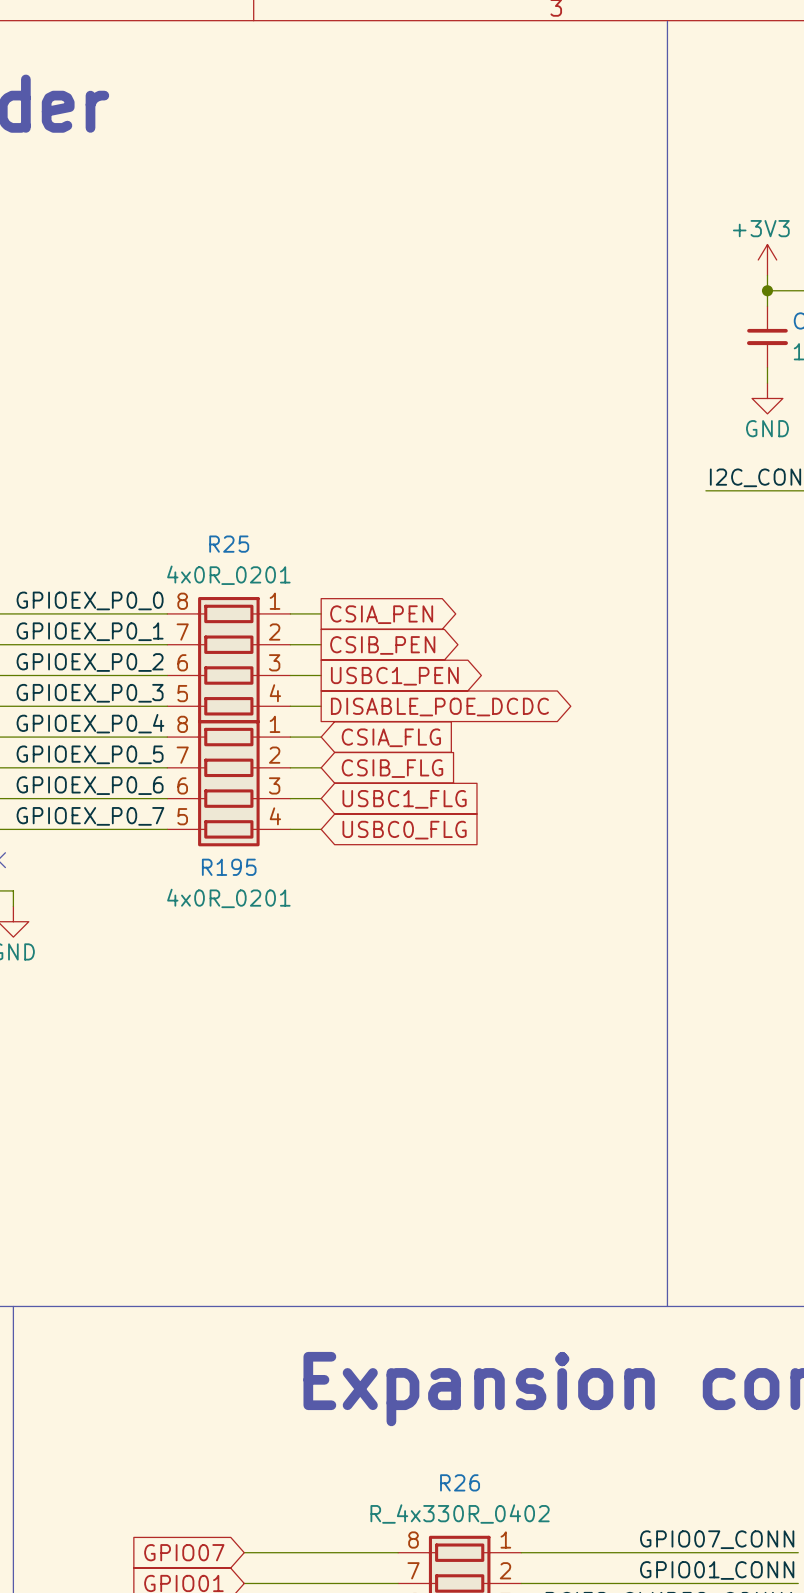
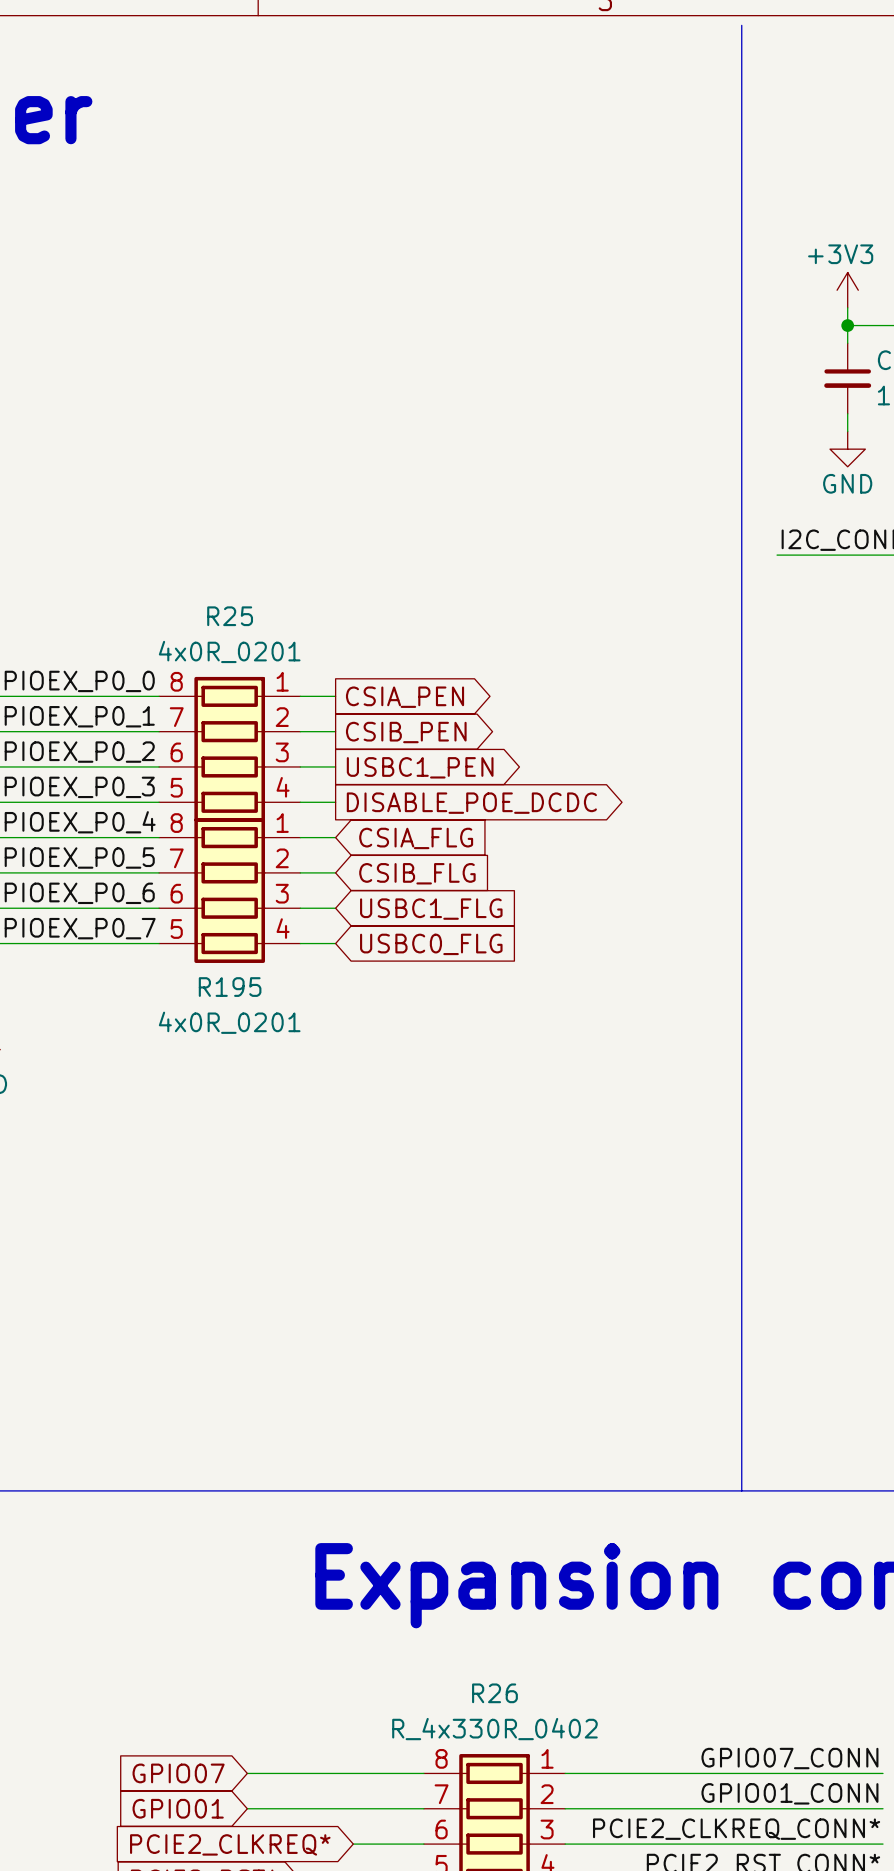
line: (667, 21) (667, 1306) -> none
line: none -> (741, 25) (741, 1490)

